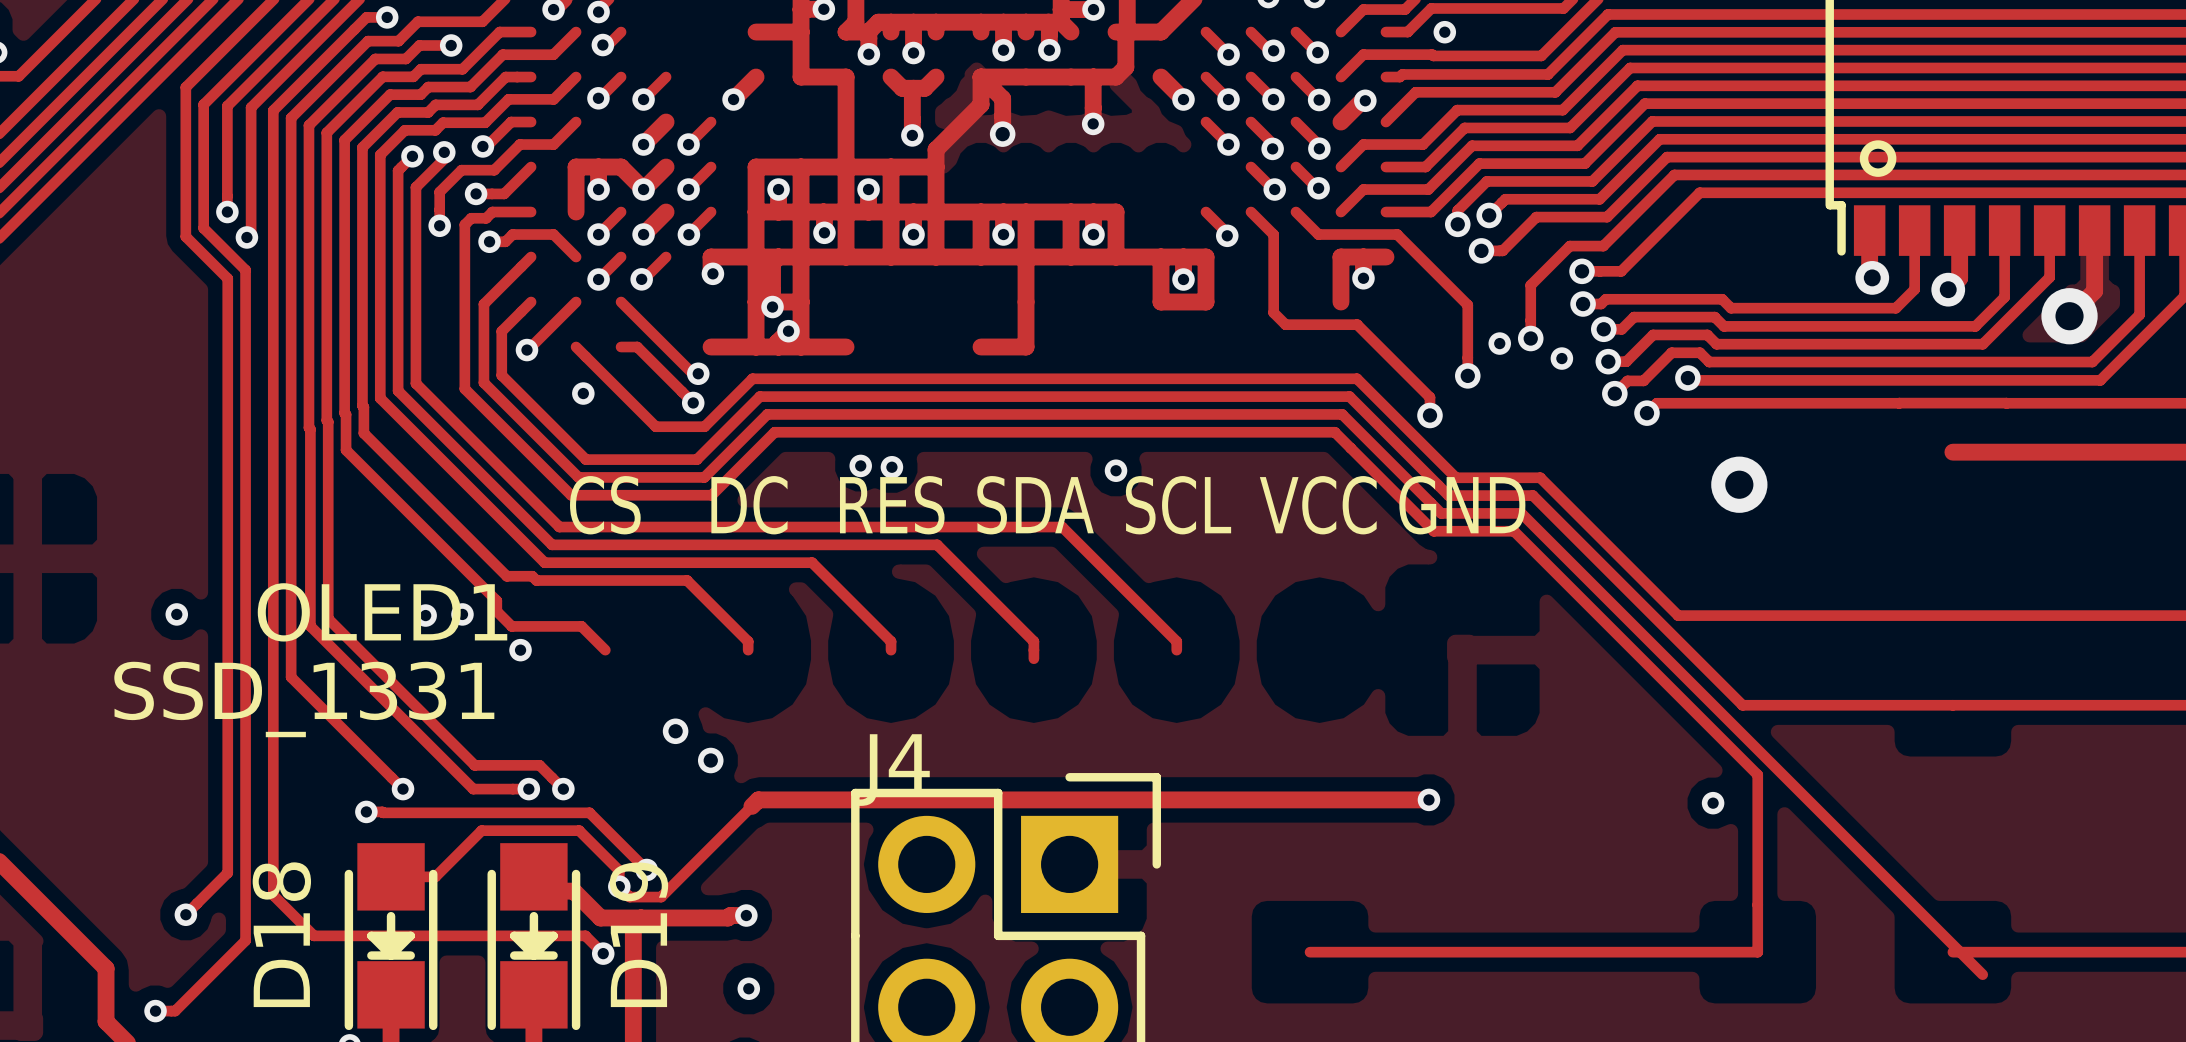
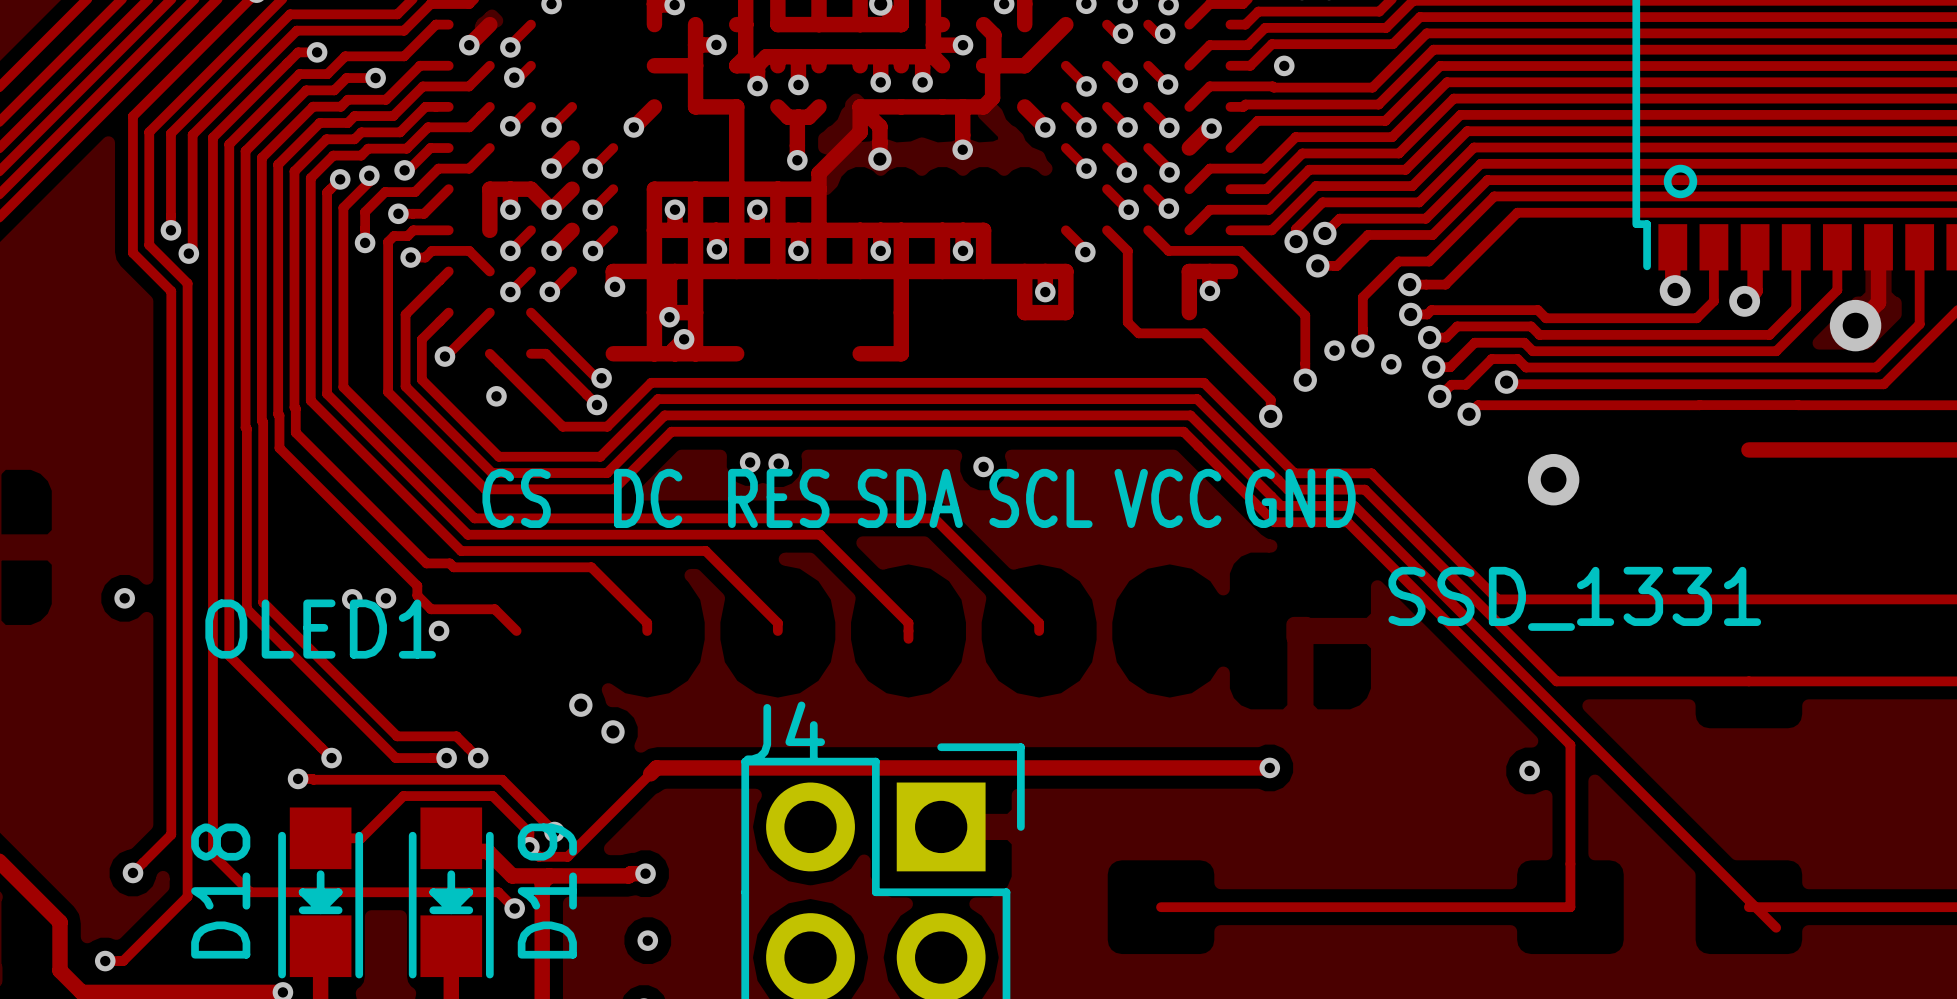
OLED1 name position: OLED1 (382, 612) -> OLED1 (320, 629)
OLED1 value position: SSD_1331 (304, 699) -> SSD_1331 (1574, 598)

